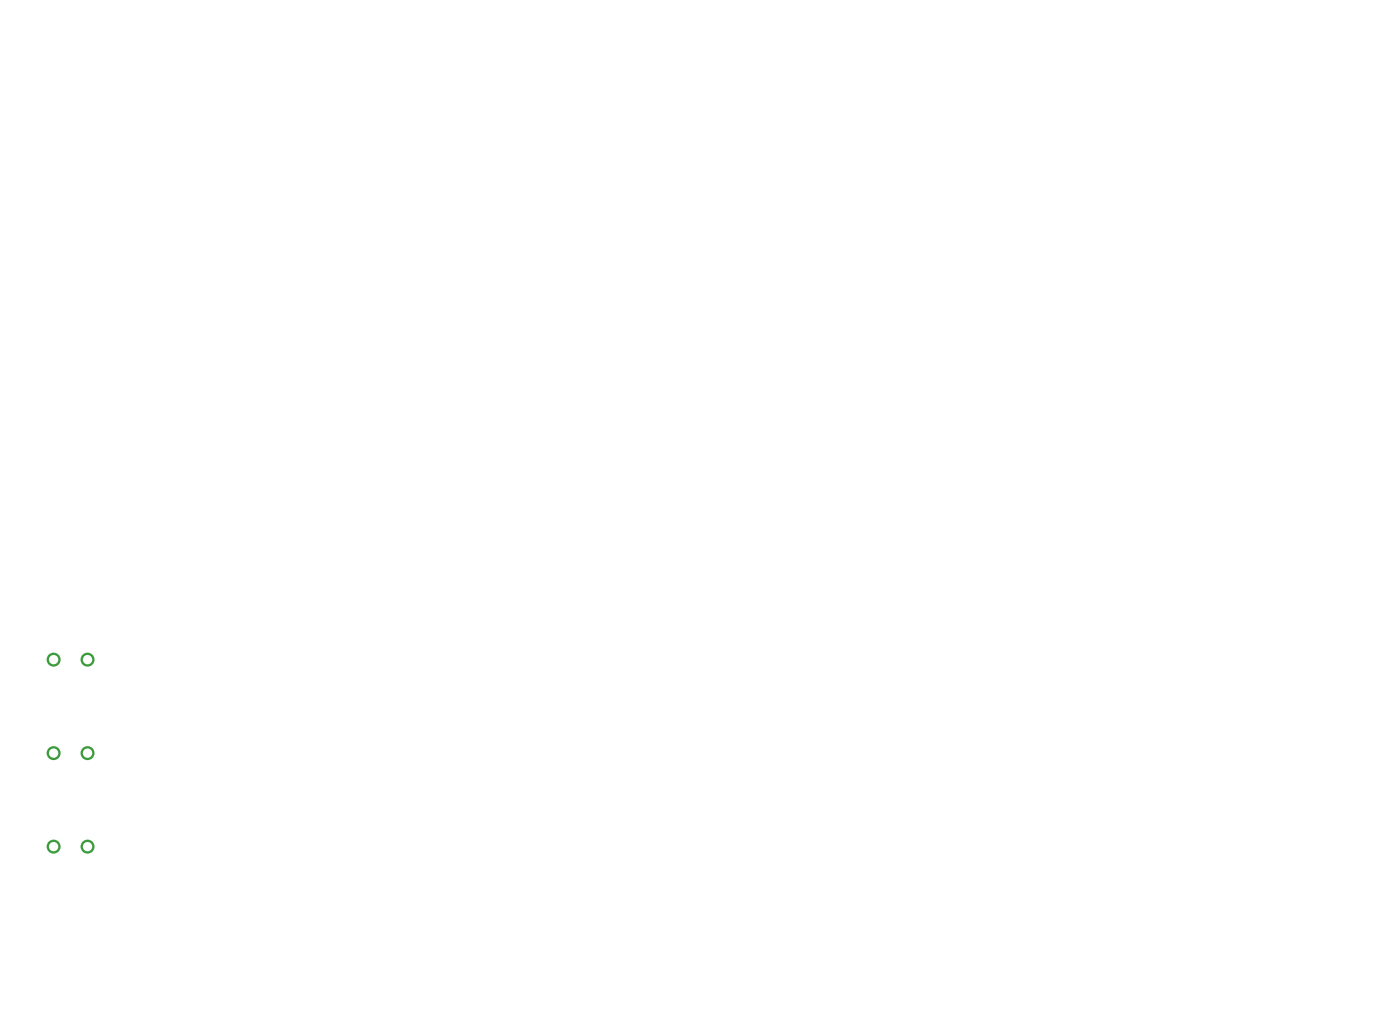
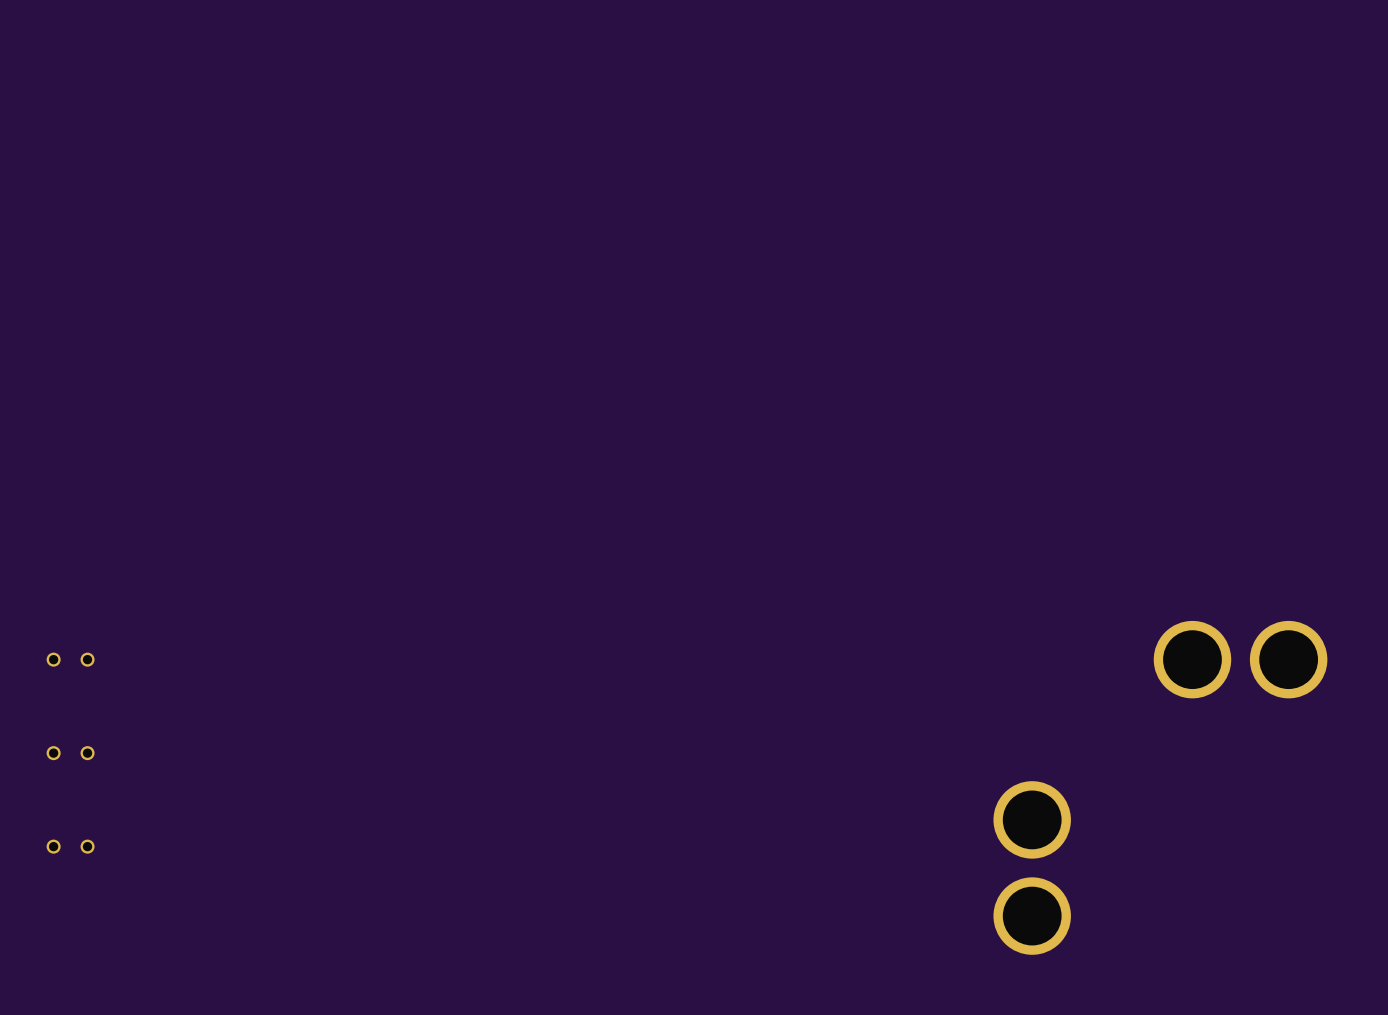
part: none -> (1240, 659)
part: none -> (1032, 867)

